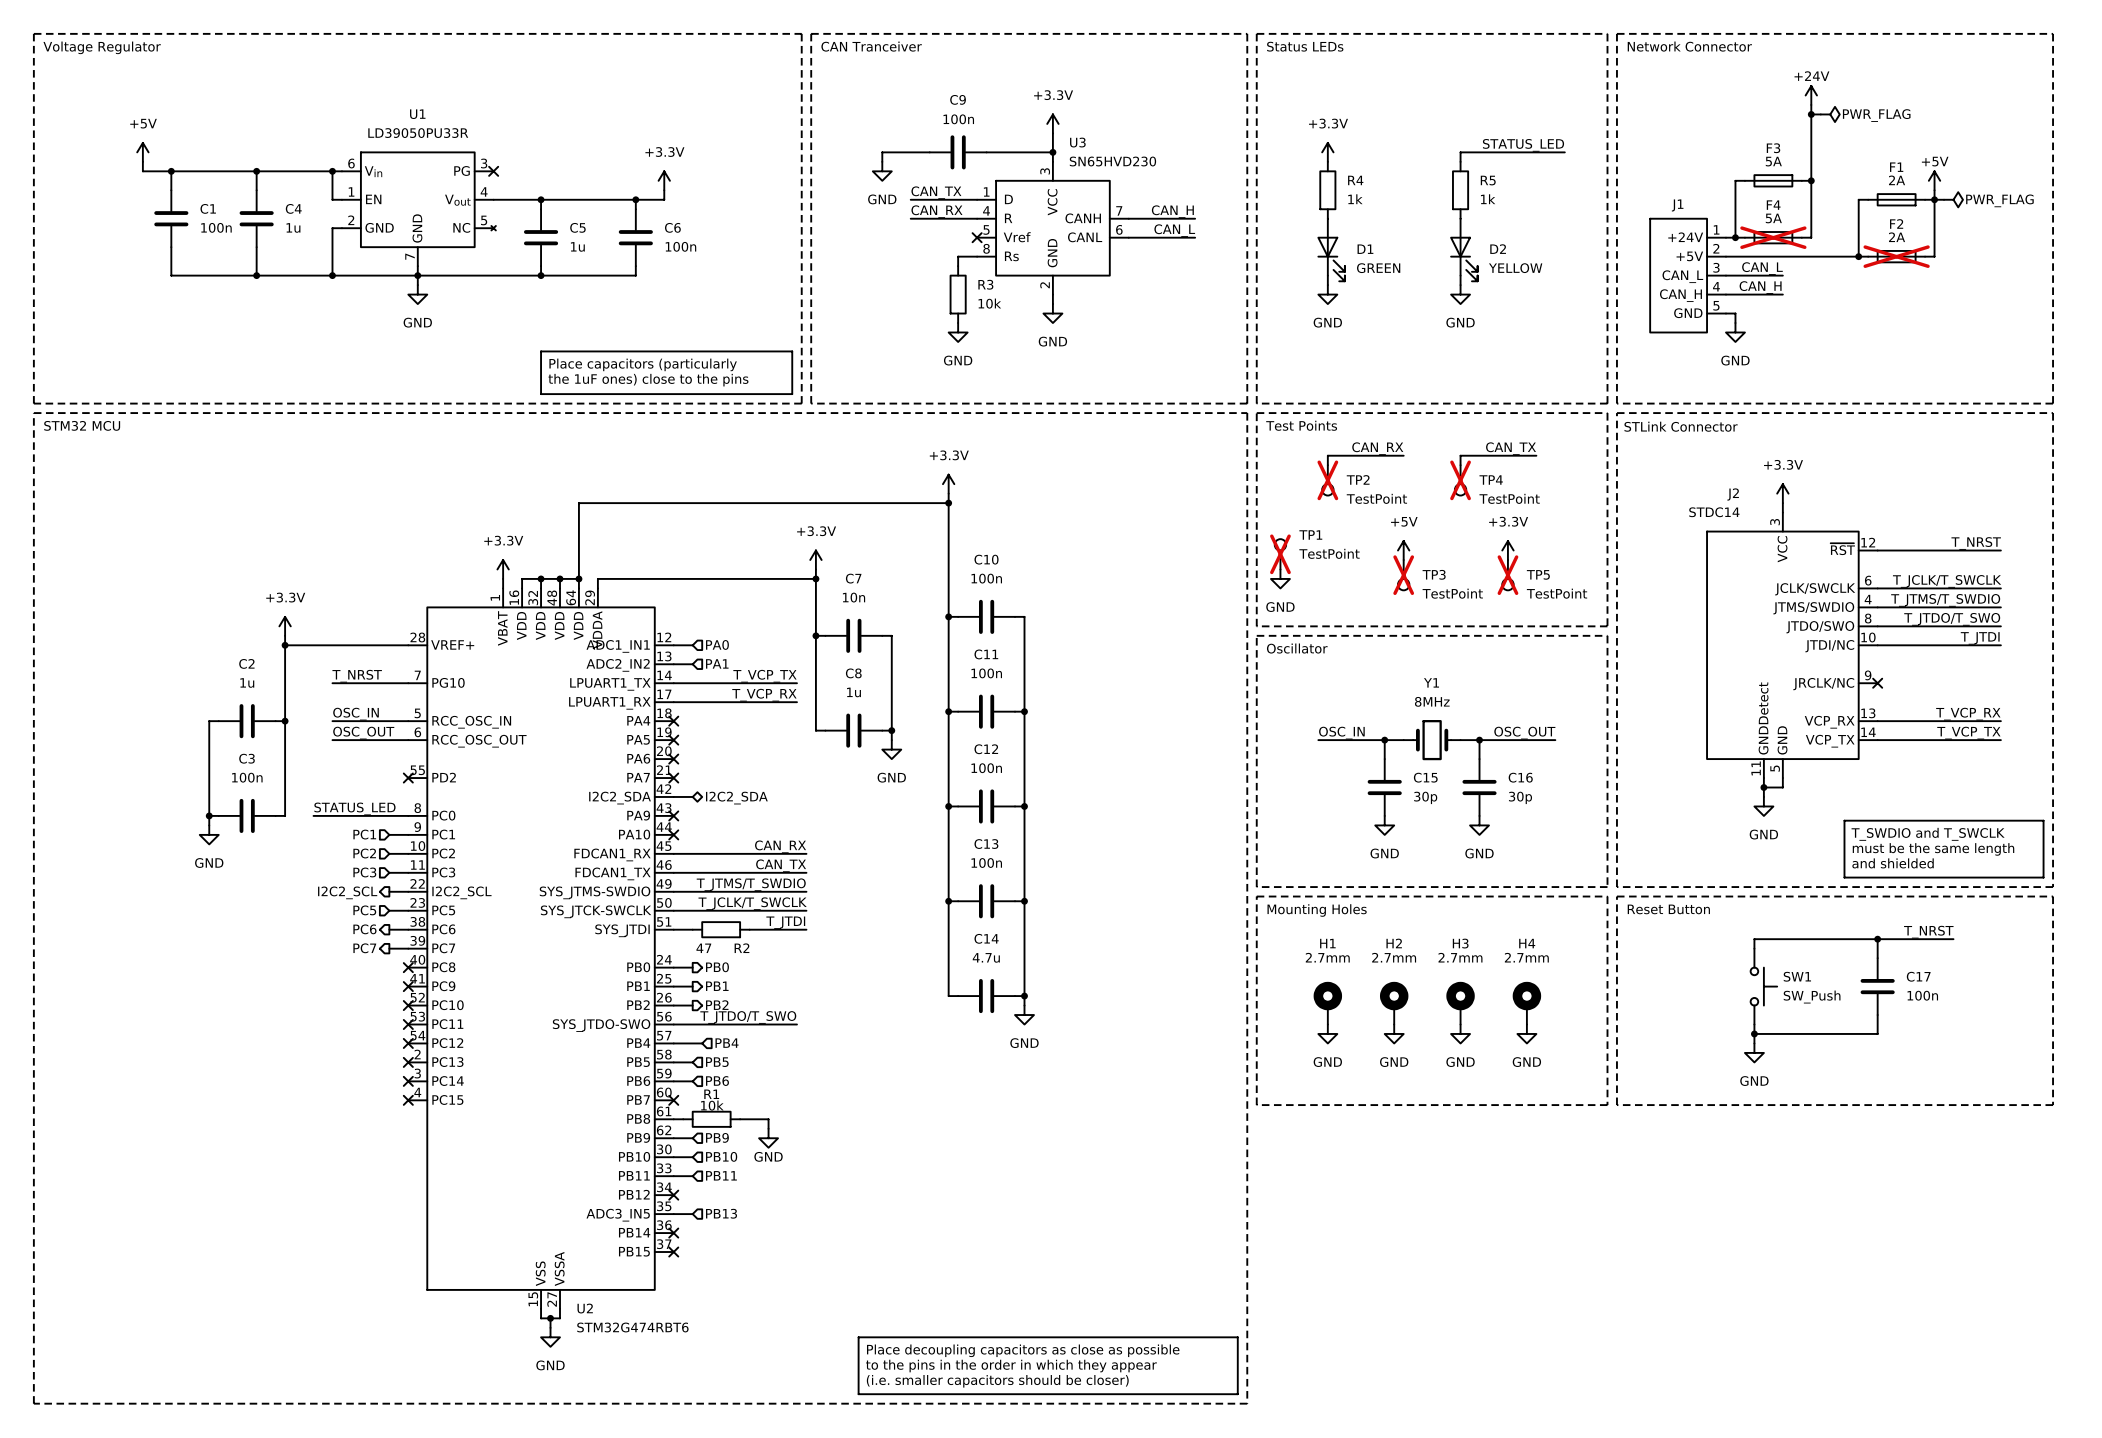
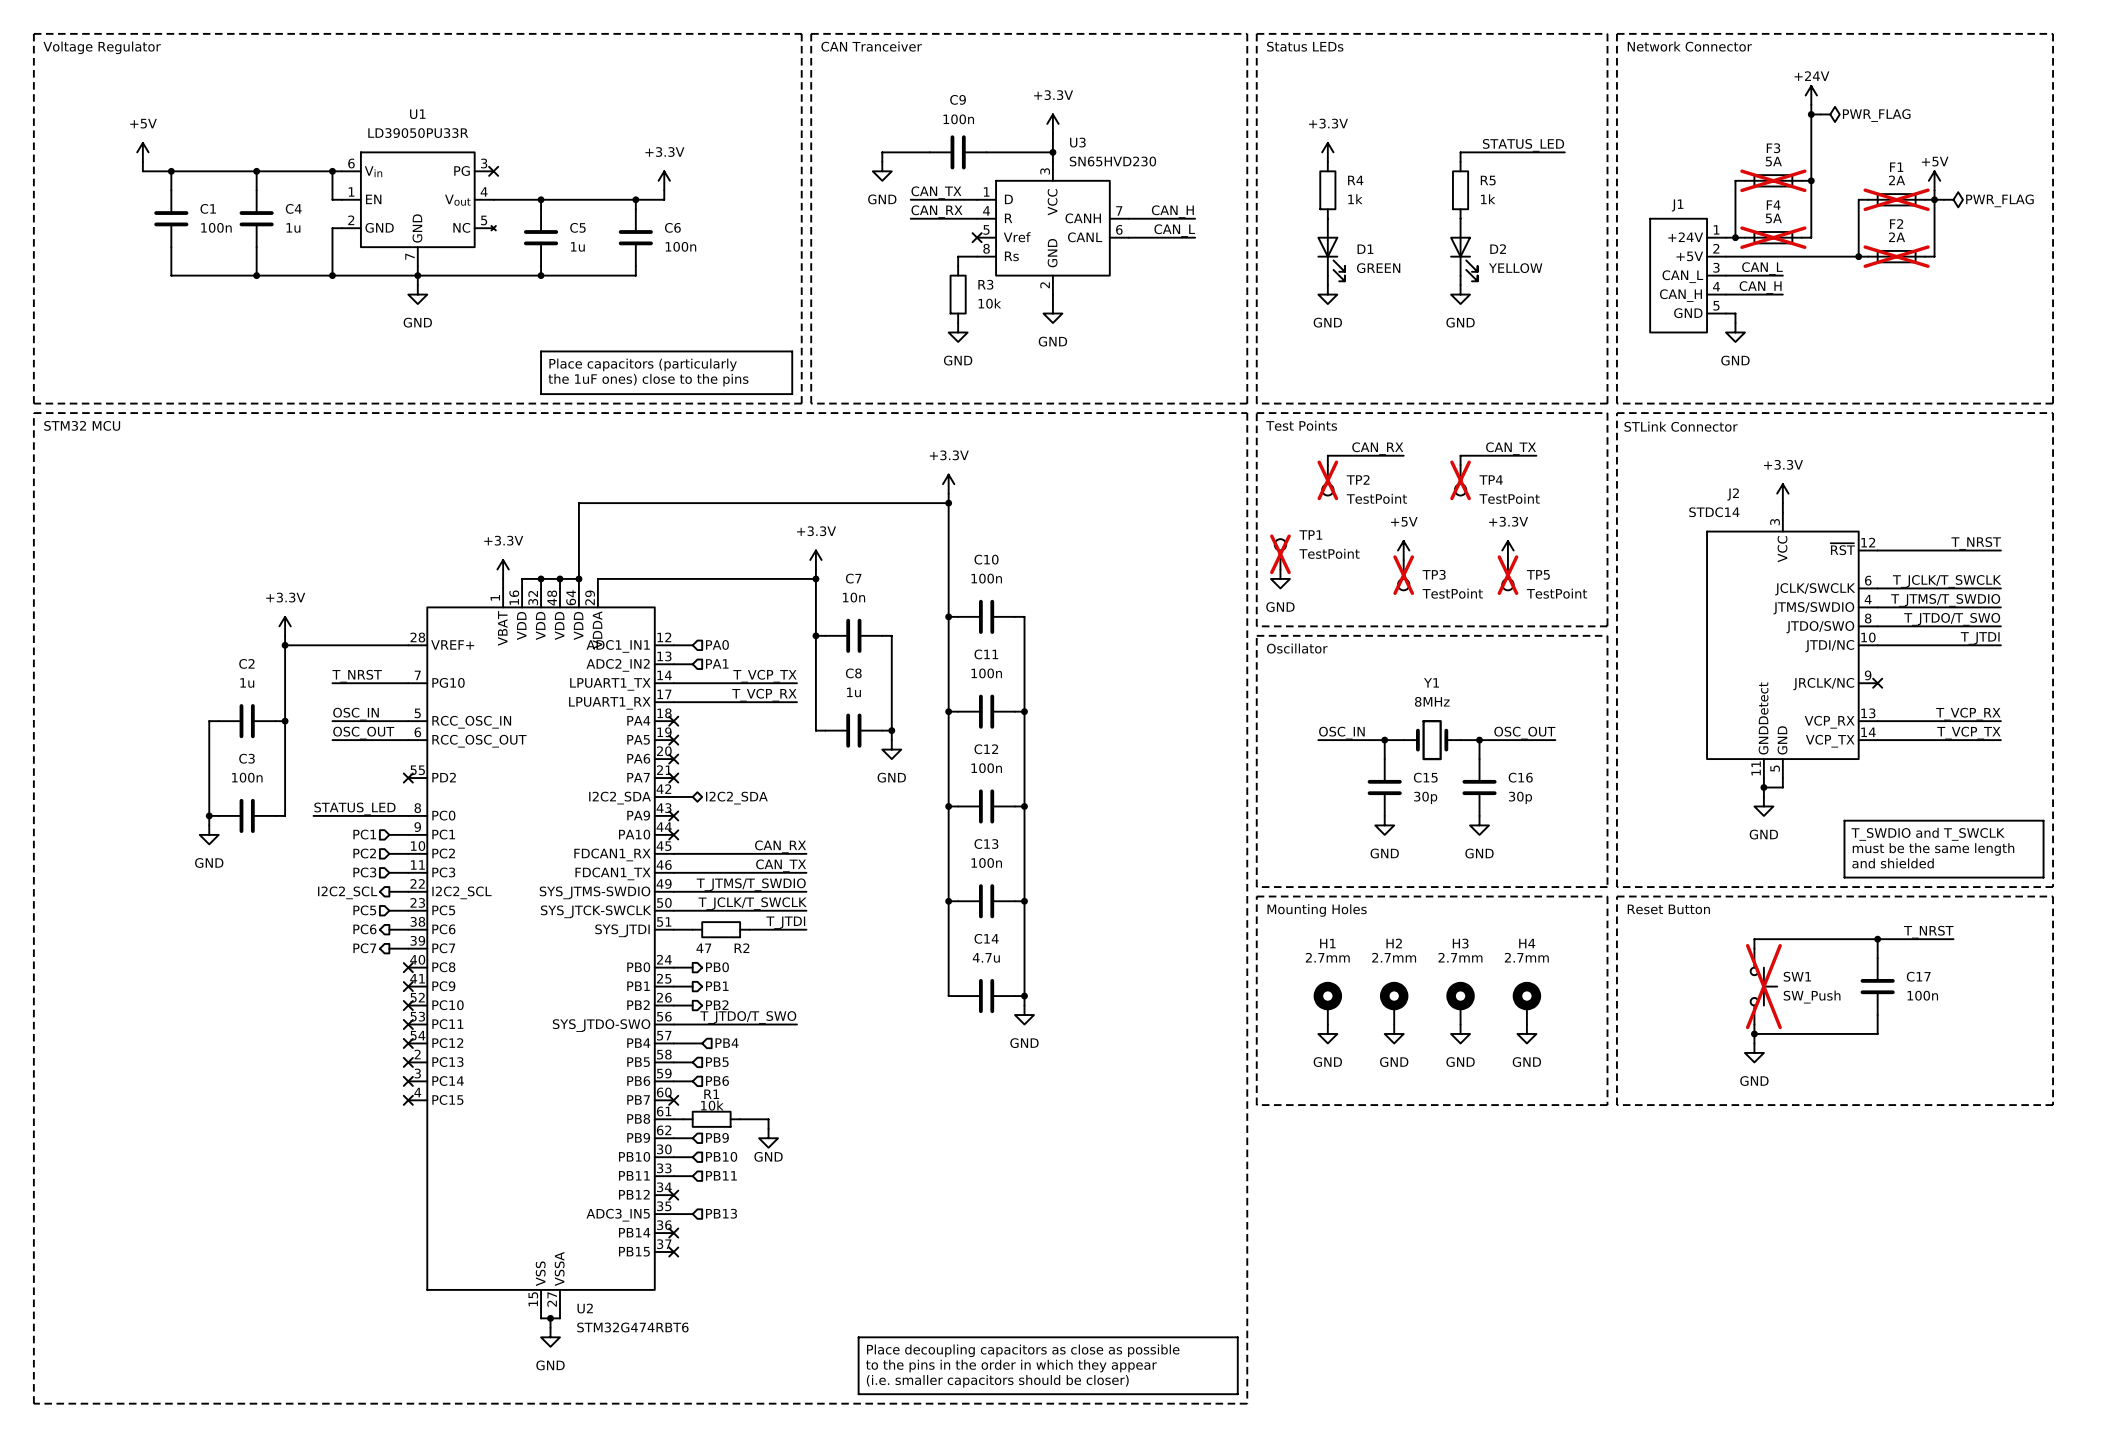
F3 do-not-place cross: none -> (1773, 180)
F1 do-not-place cross: none -> (1896, 199)
SW1 do-not-place cross: none -> (1763, 986)

